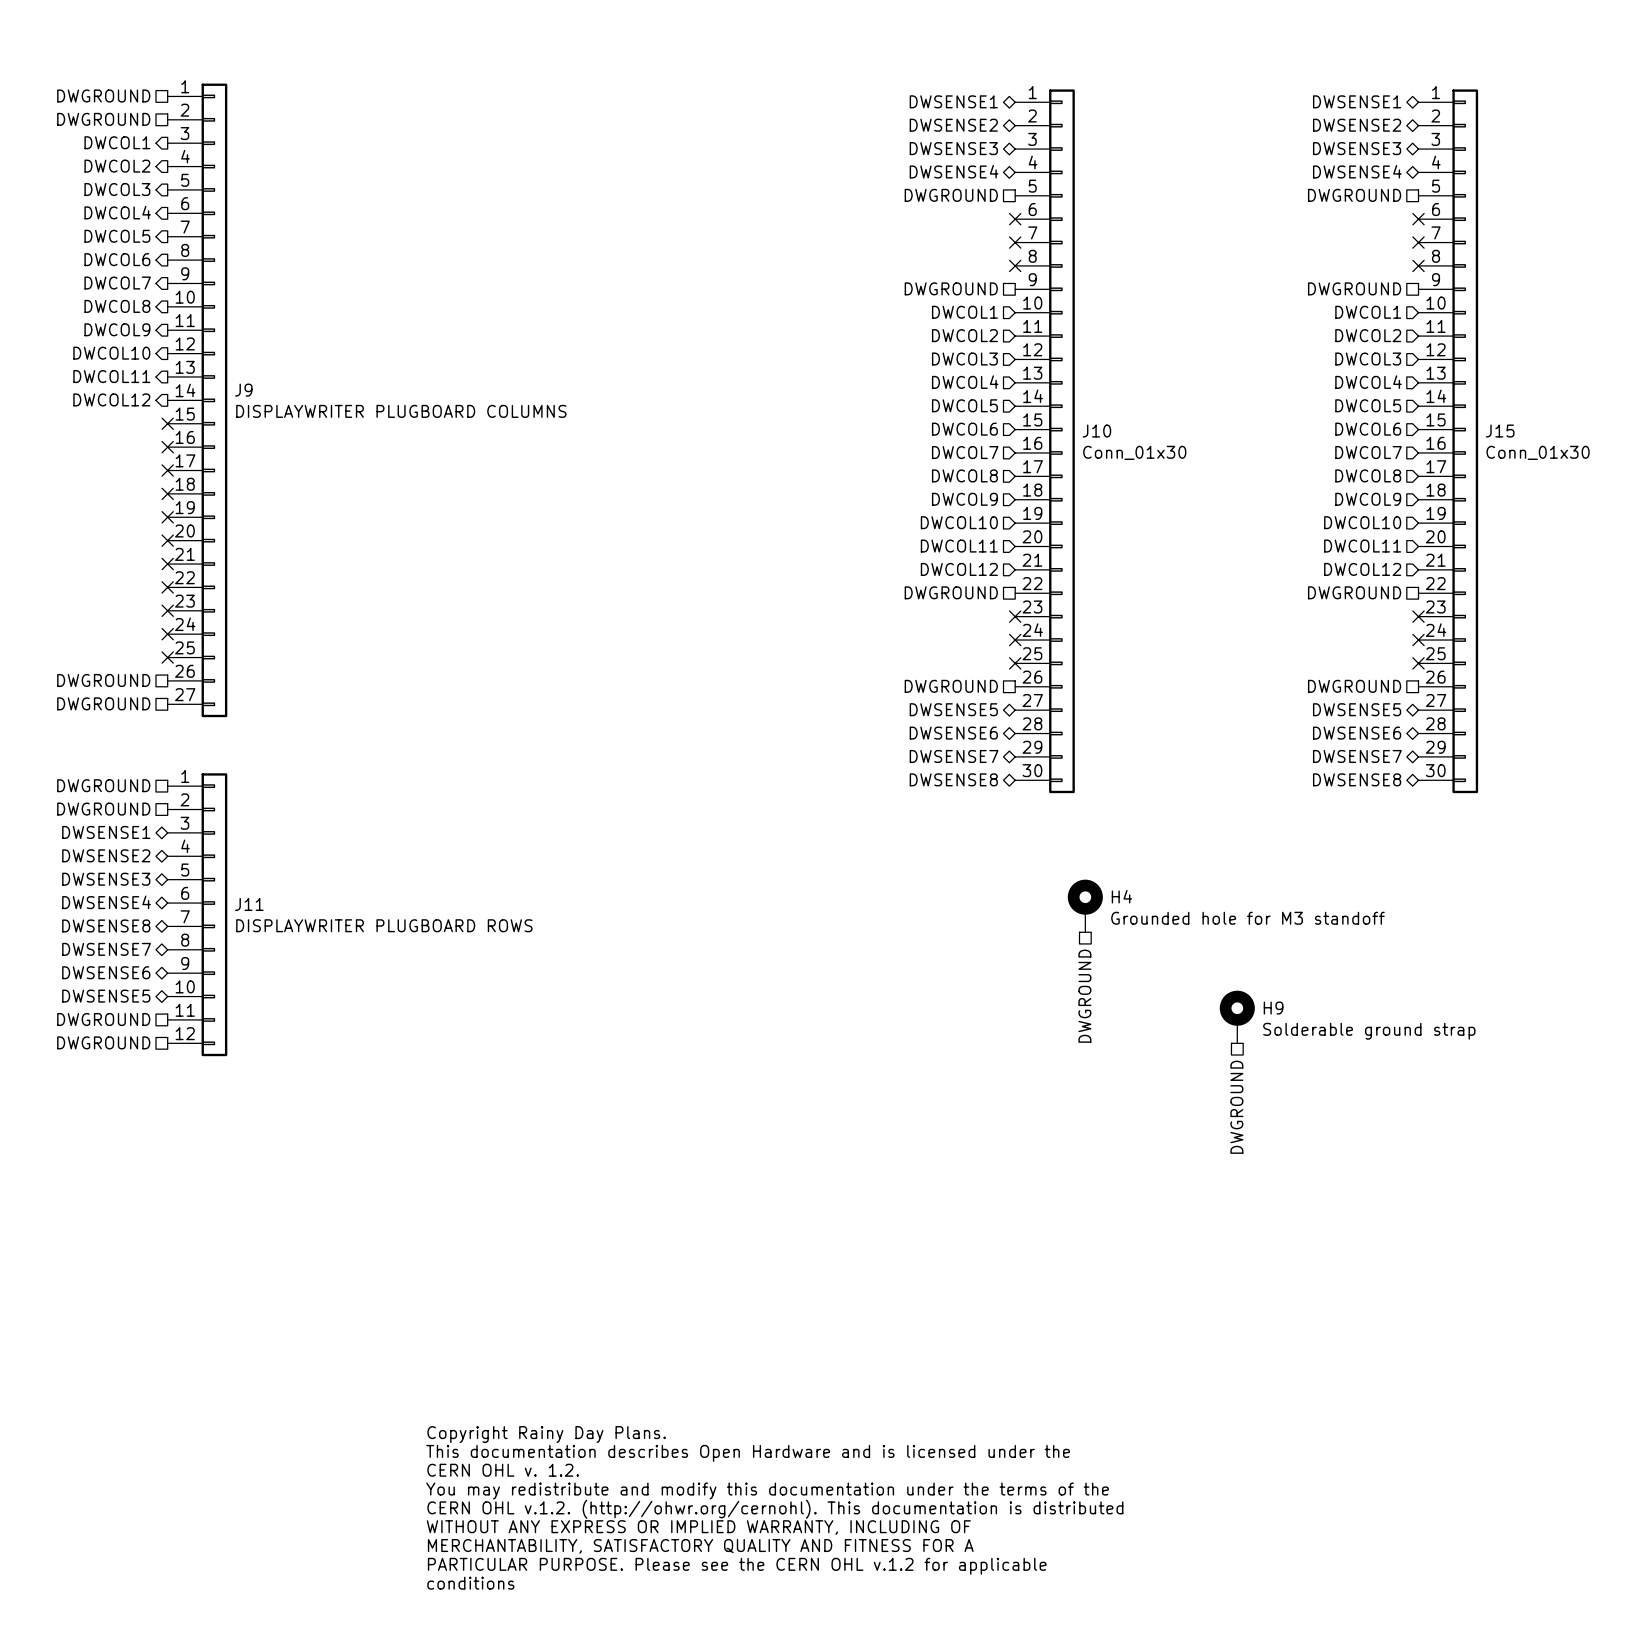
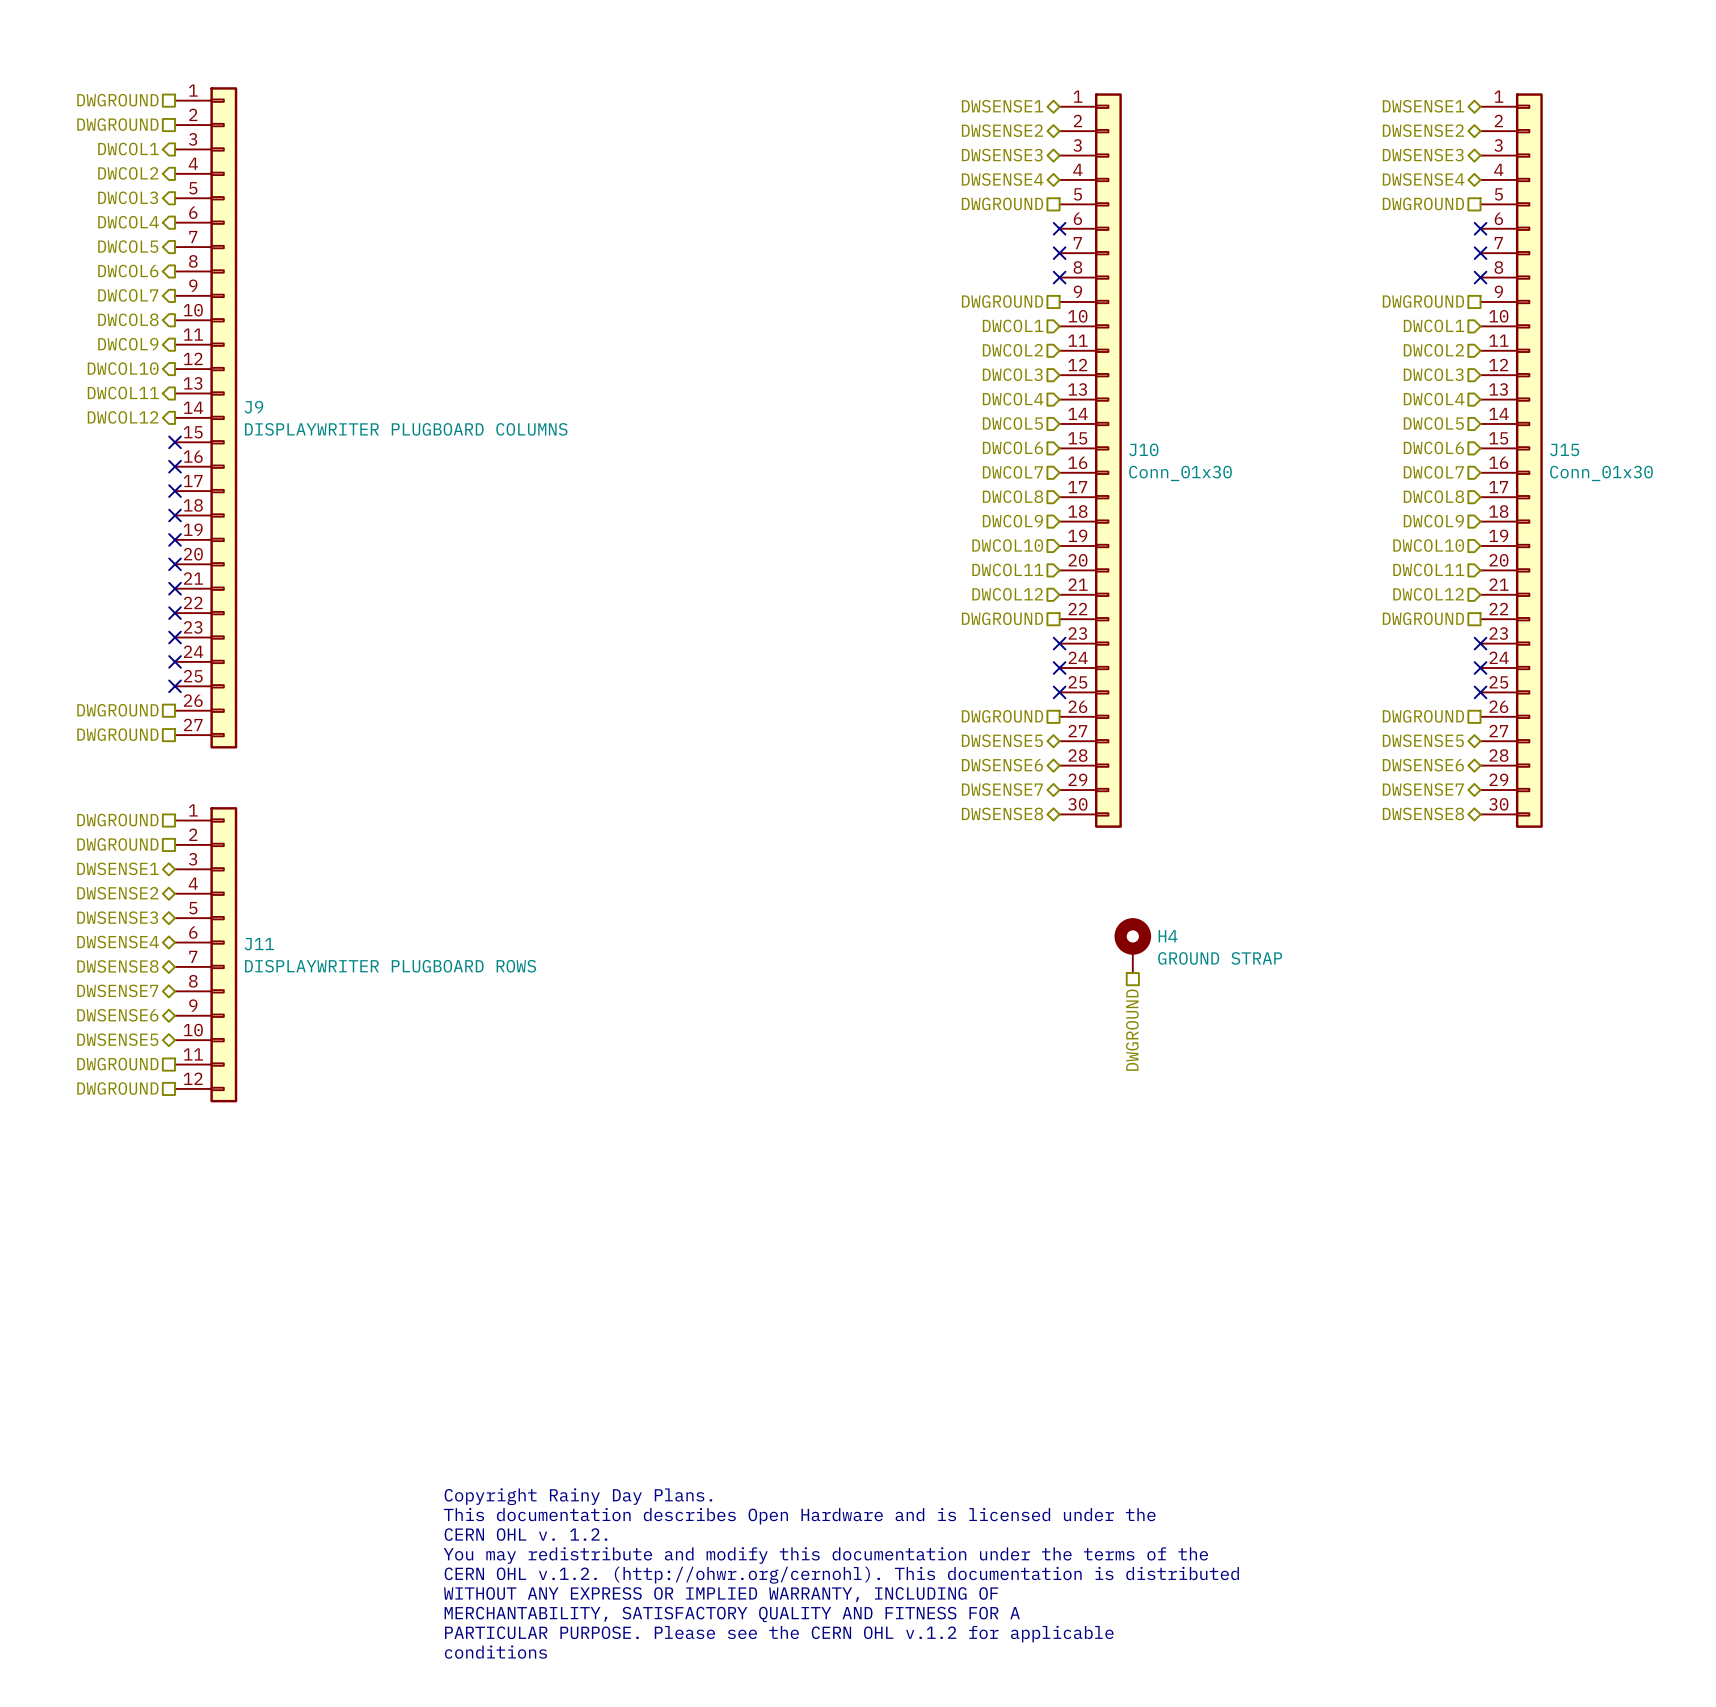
H4 value: Grounded hole for M3 standoff (1247, 918) -> GROUND STRAP (1220, 958)
H9: Solderable ground strap (1237, 1017) -> none
hierarchical label: DWGROUND (1236, 1107) -> none

